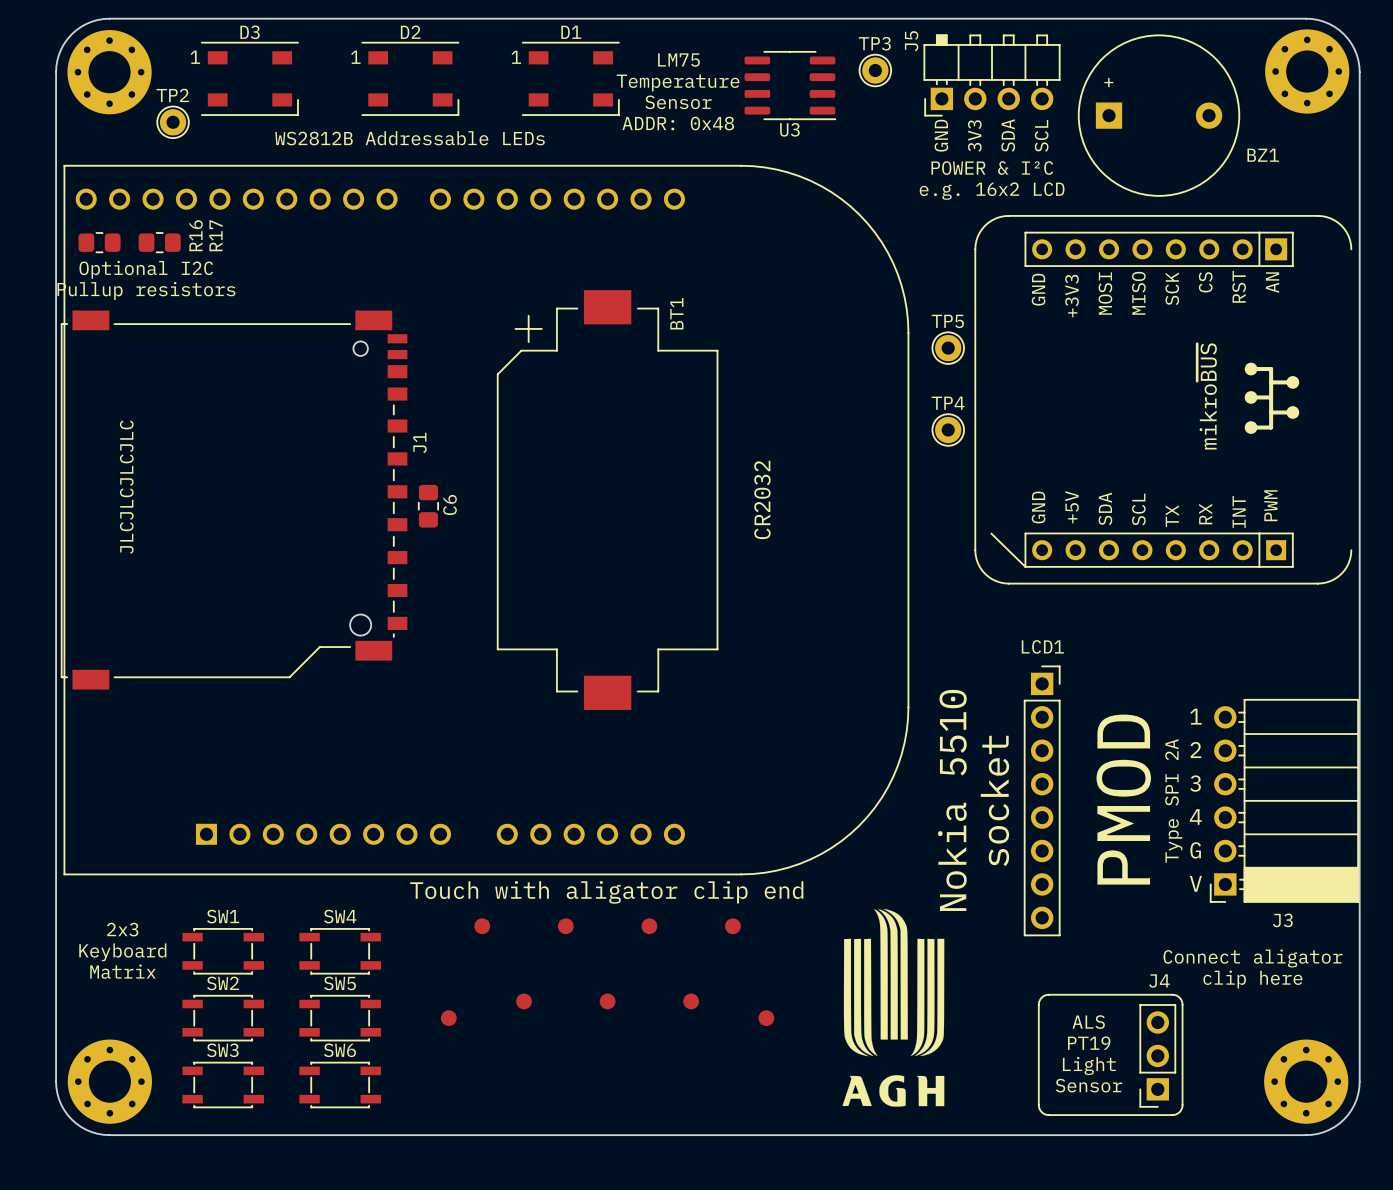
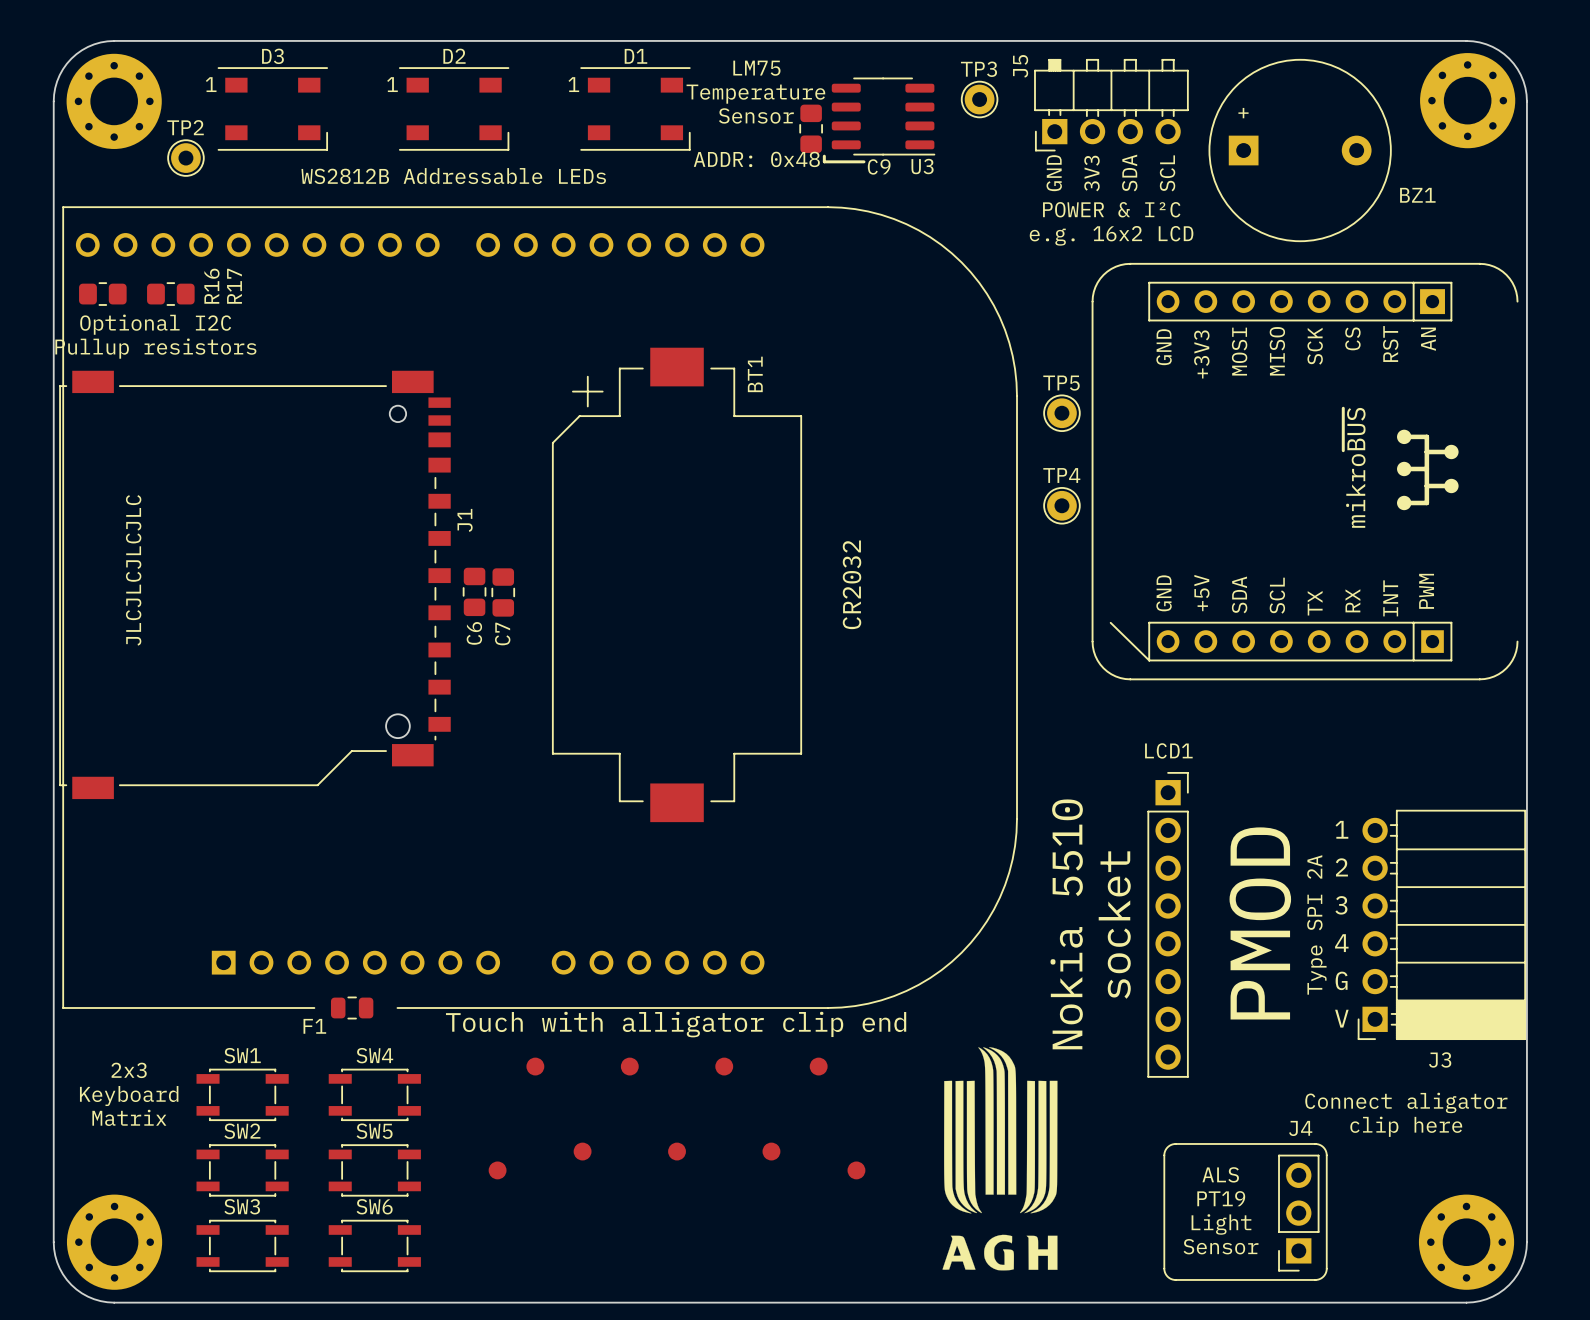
text: none -> LM75 (756, 68)
text: LM75 (678, 60) -> Temperature (755, 94)
text: Temperature (678, 83) -> Sensor (756, 115)
C9: none -> (811, 128)
text: Sensor (678, 102) -> none
line: none -> (824, 156) (824, 161) (864, 161)
U3 name position: U3 (789, 129) -> U3 (922, 166)
part footprint: [63, 164, 910, 876] -> [62, 206, 1018, 1009]
C6 name position: C6 (450, 504) -> C6 (474, 633)
C7: none -> (503, 592)
F1: none -> (352, 1007)
text: Touch with aligator clip end (606, 892) -> Touch with alligator clip end (676, 1024)

